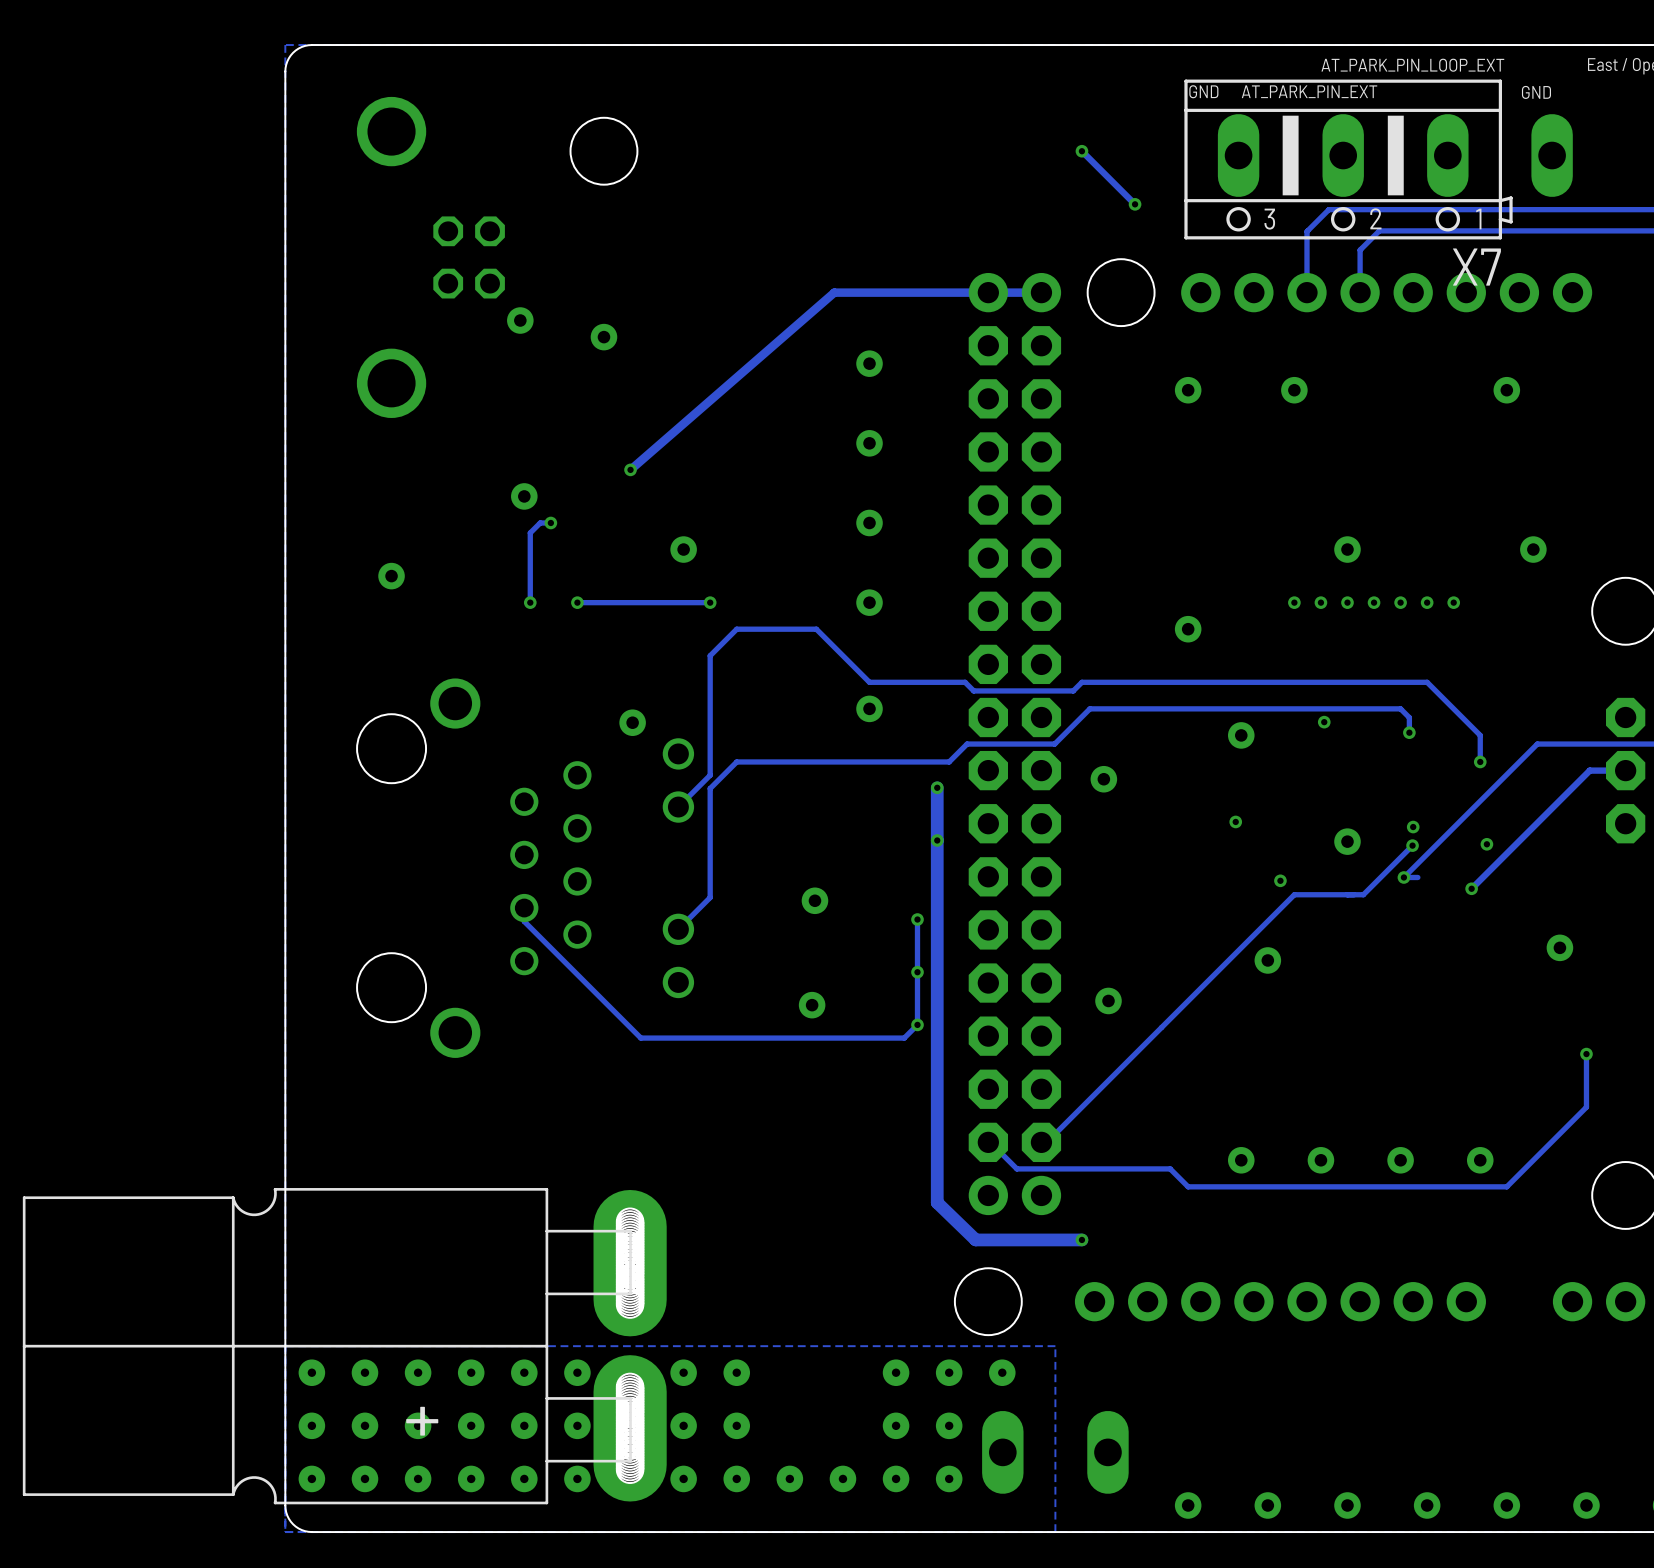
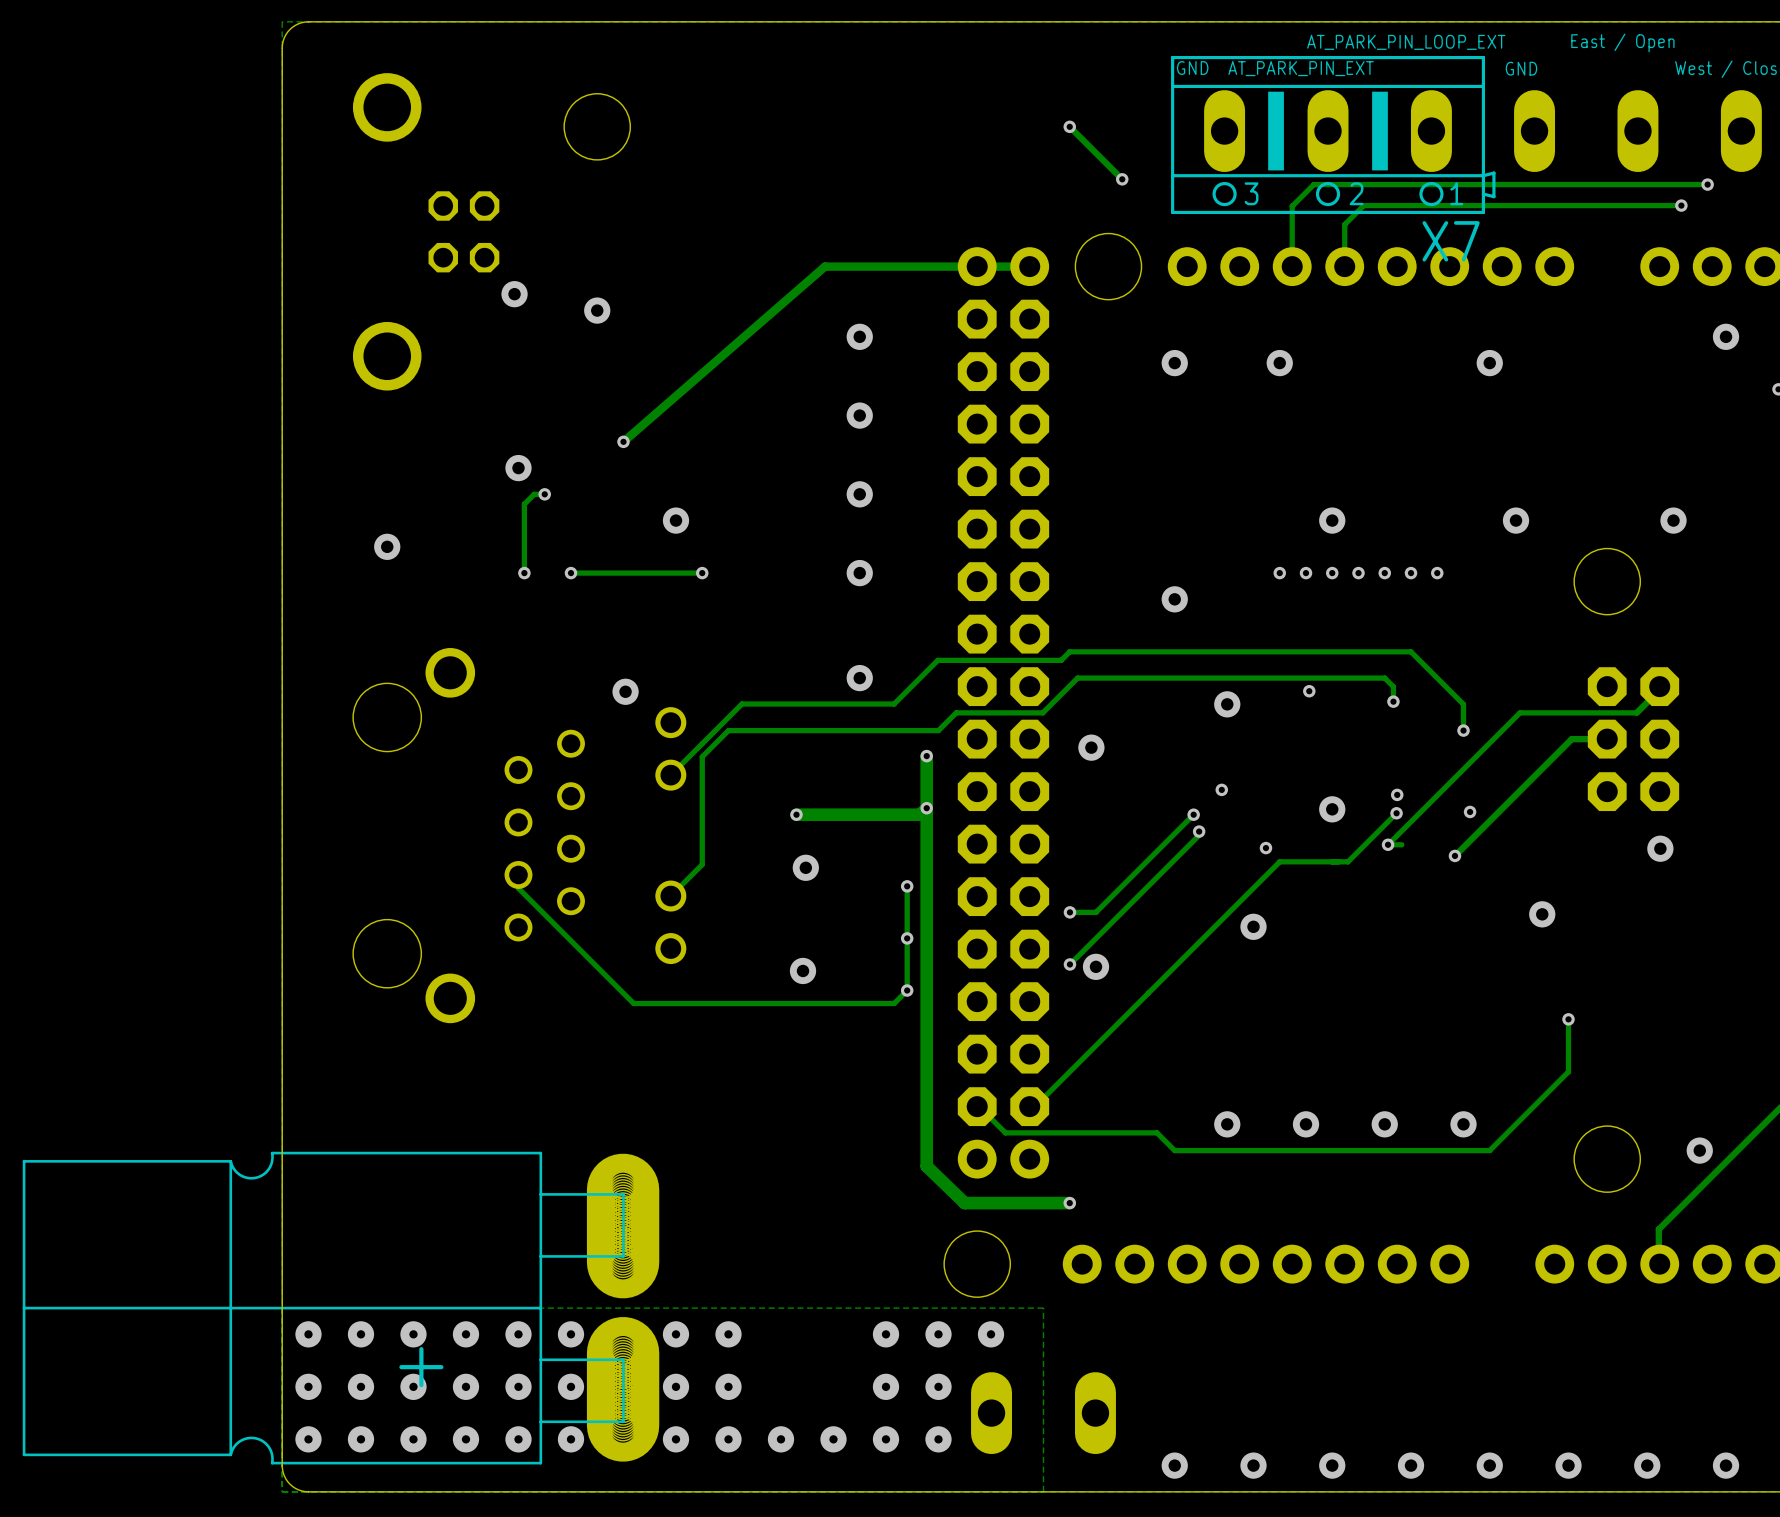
track: (973, 690) (965, 682) (869, 682) (816, 629) (736, 629) (710, 655) (710, 775) -> (962, 660) (937, 660) (894, 704) (741, 704) (702, 743)
track: none -> (926, 808) (920, 814) (796, 814)
via: none -> (796, 814)
track: none -> (1193, 814) (1096, 912) (1069, 912)
via: none -> (1193, 814)
track: none -> (1199, 831) (1199, 835) (1069, 964)
via: none -> (1199, 831)
via: none -> (1069, 912)
via: none -> (1069, 964)

